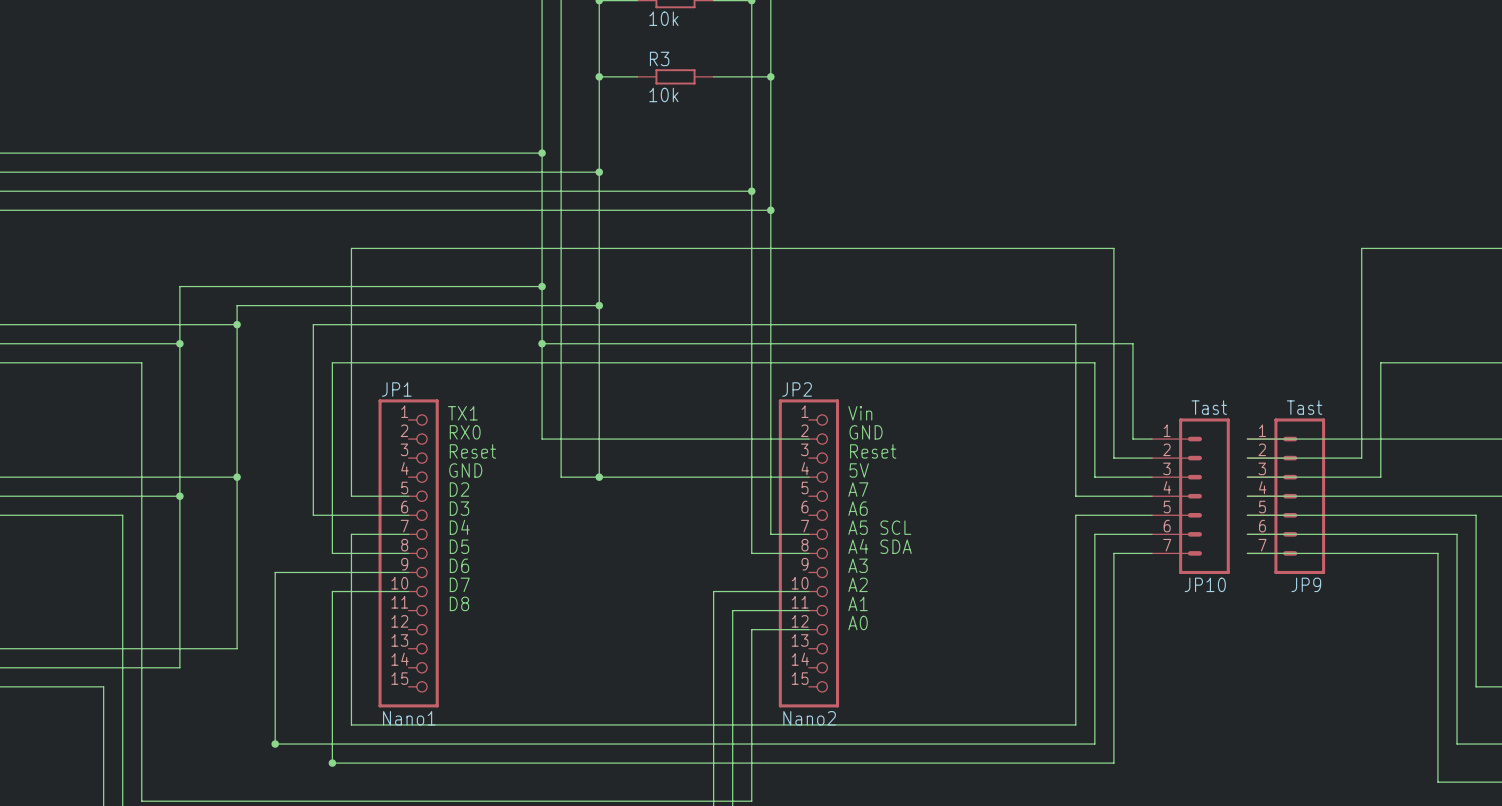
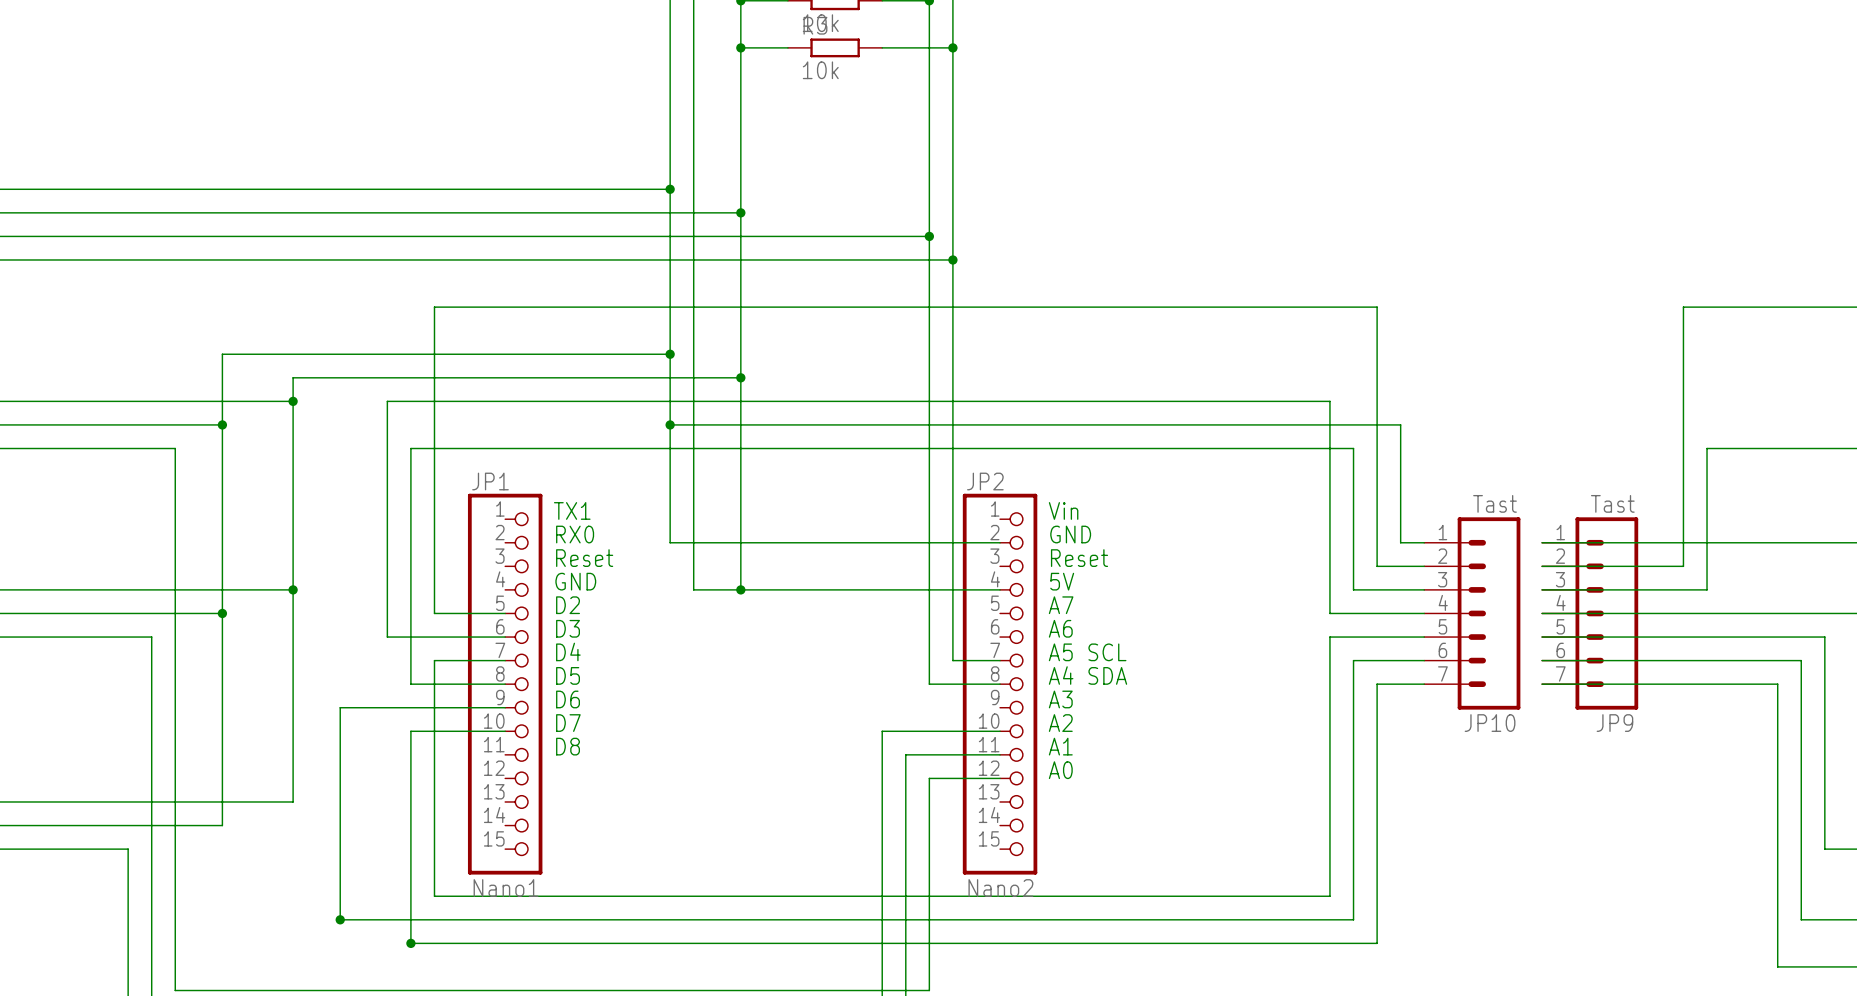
wire: (599, 76) (637, 76) -> (740, 47) (787, 47)
junction position: (599, 76) -> (740, 47)
R3 position: (675, 76) -> (835, 47)
wire: (713, 76) (770, 76) -> (882, 47) (952, 47)
junction position: (770, 76) -> (952, 47)

